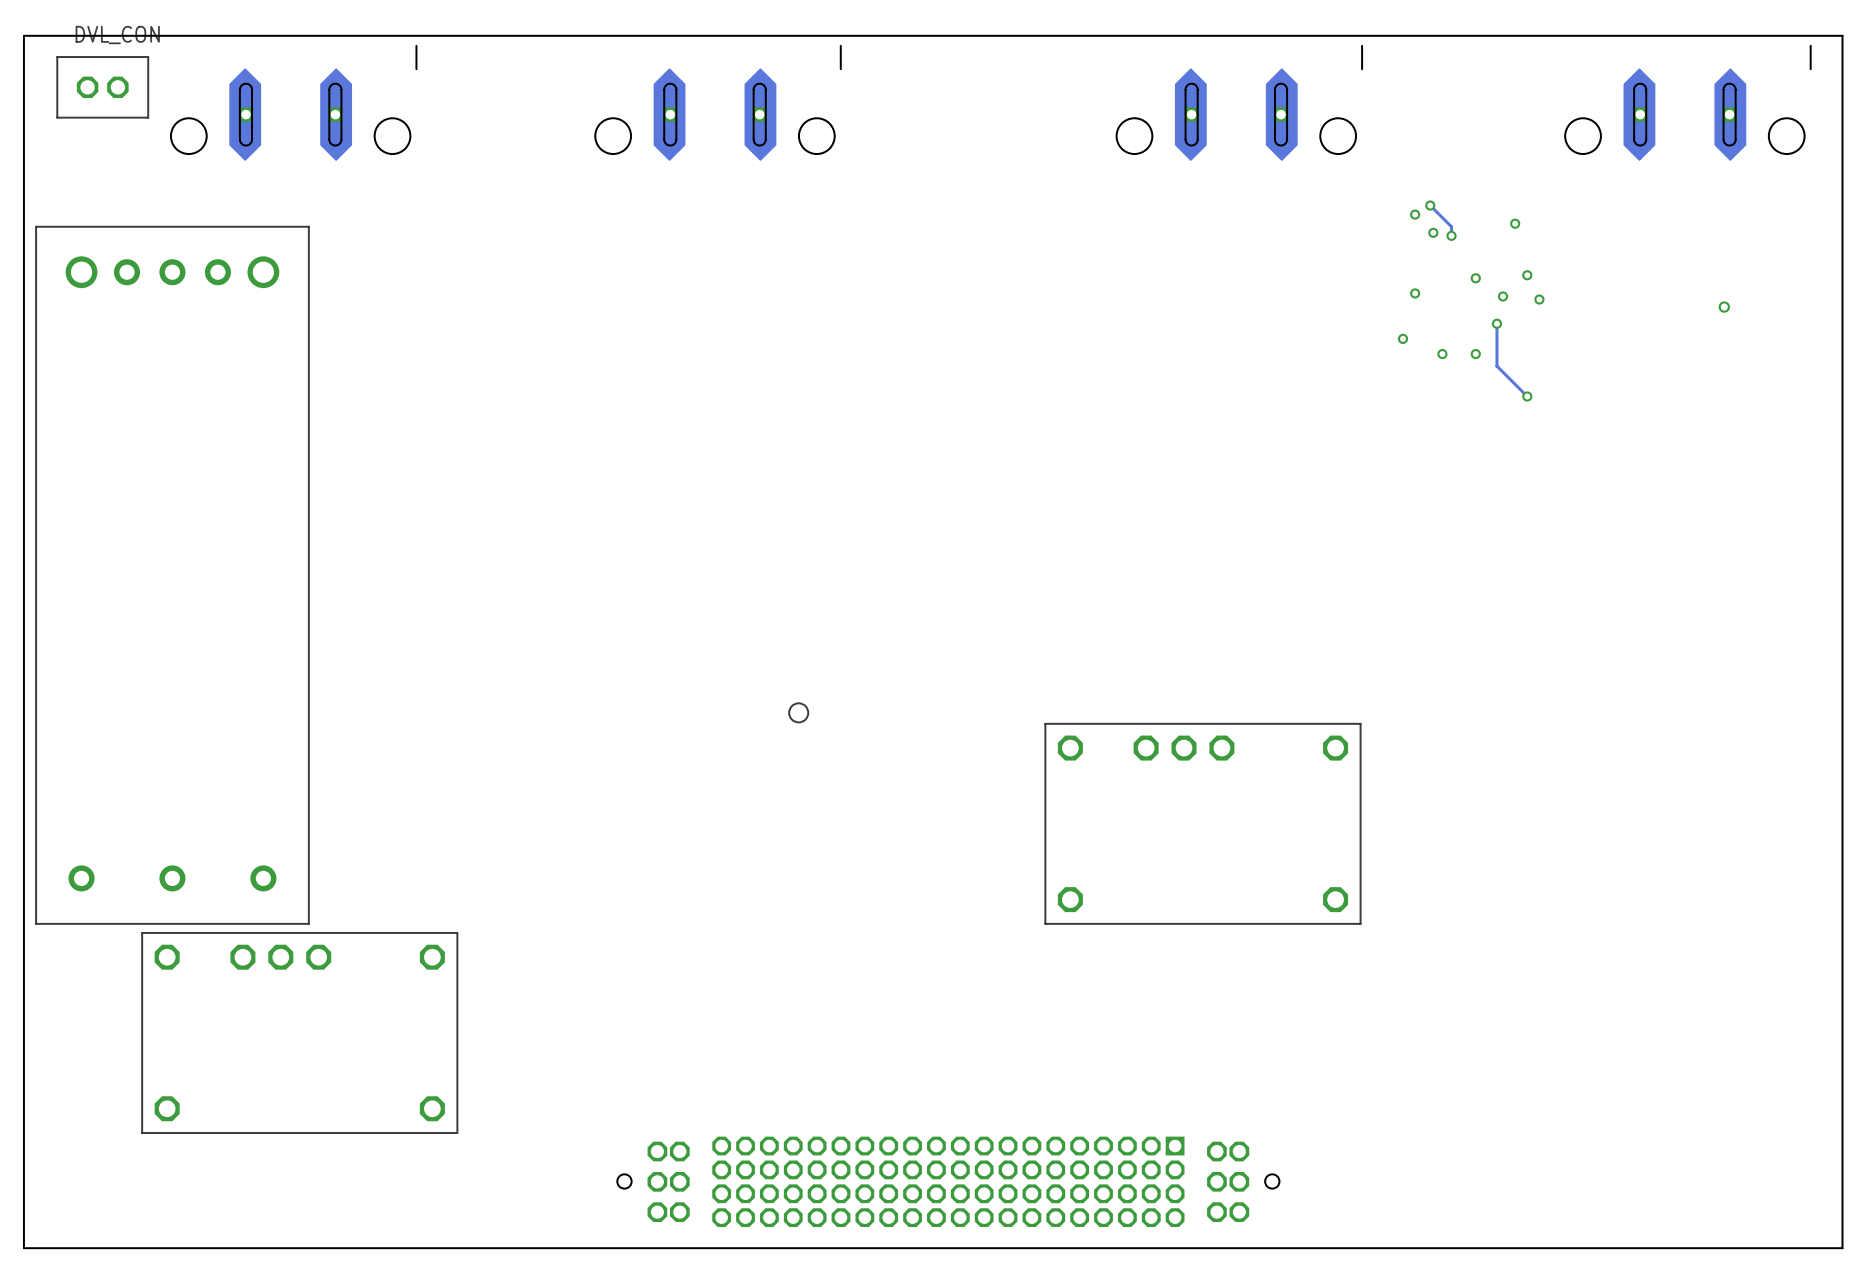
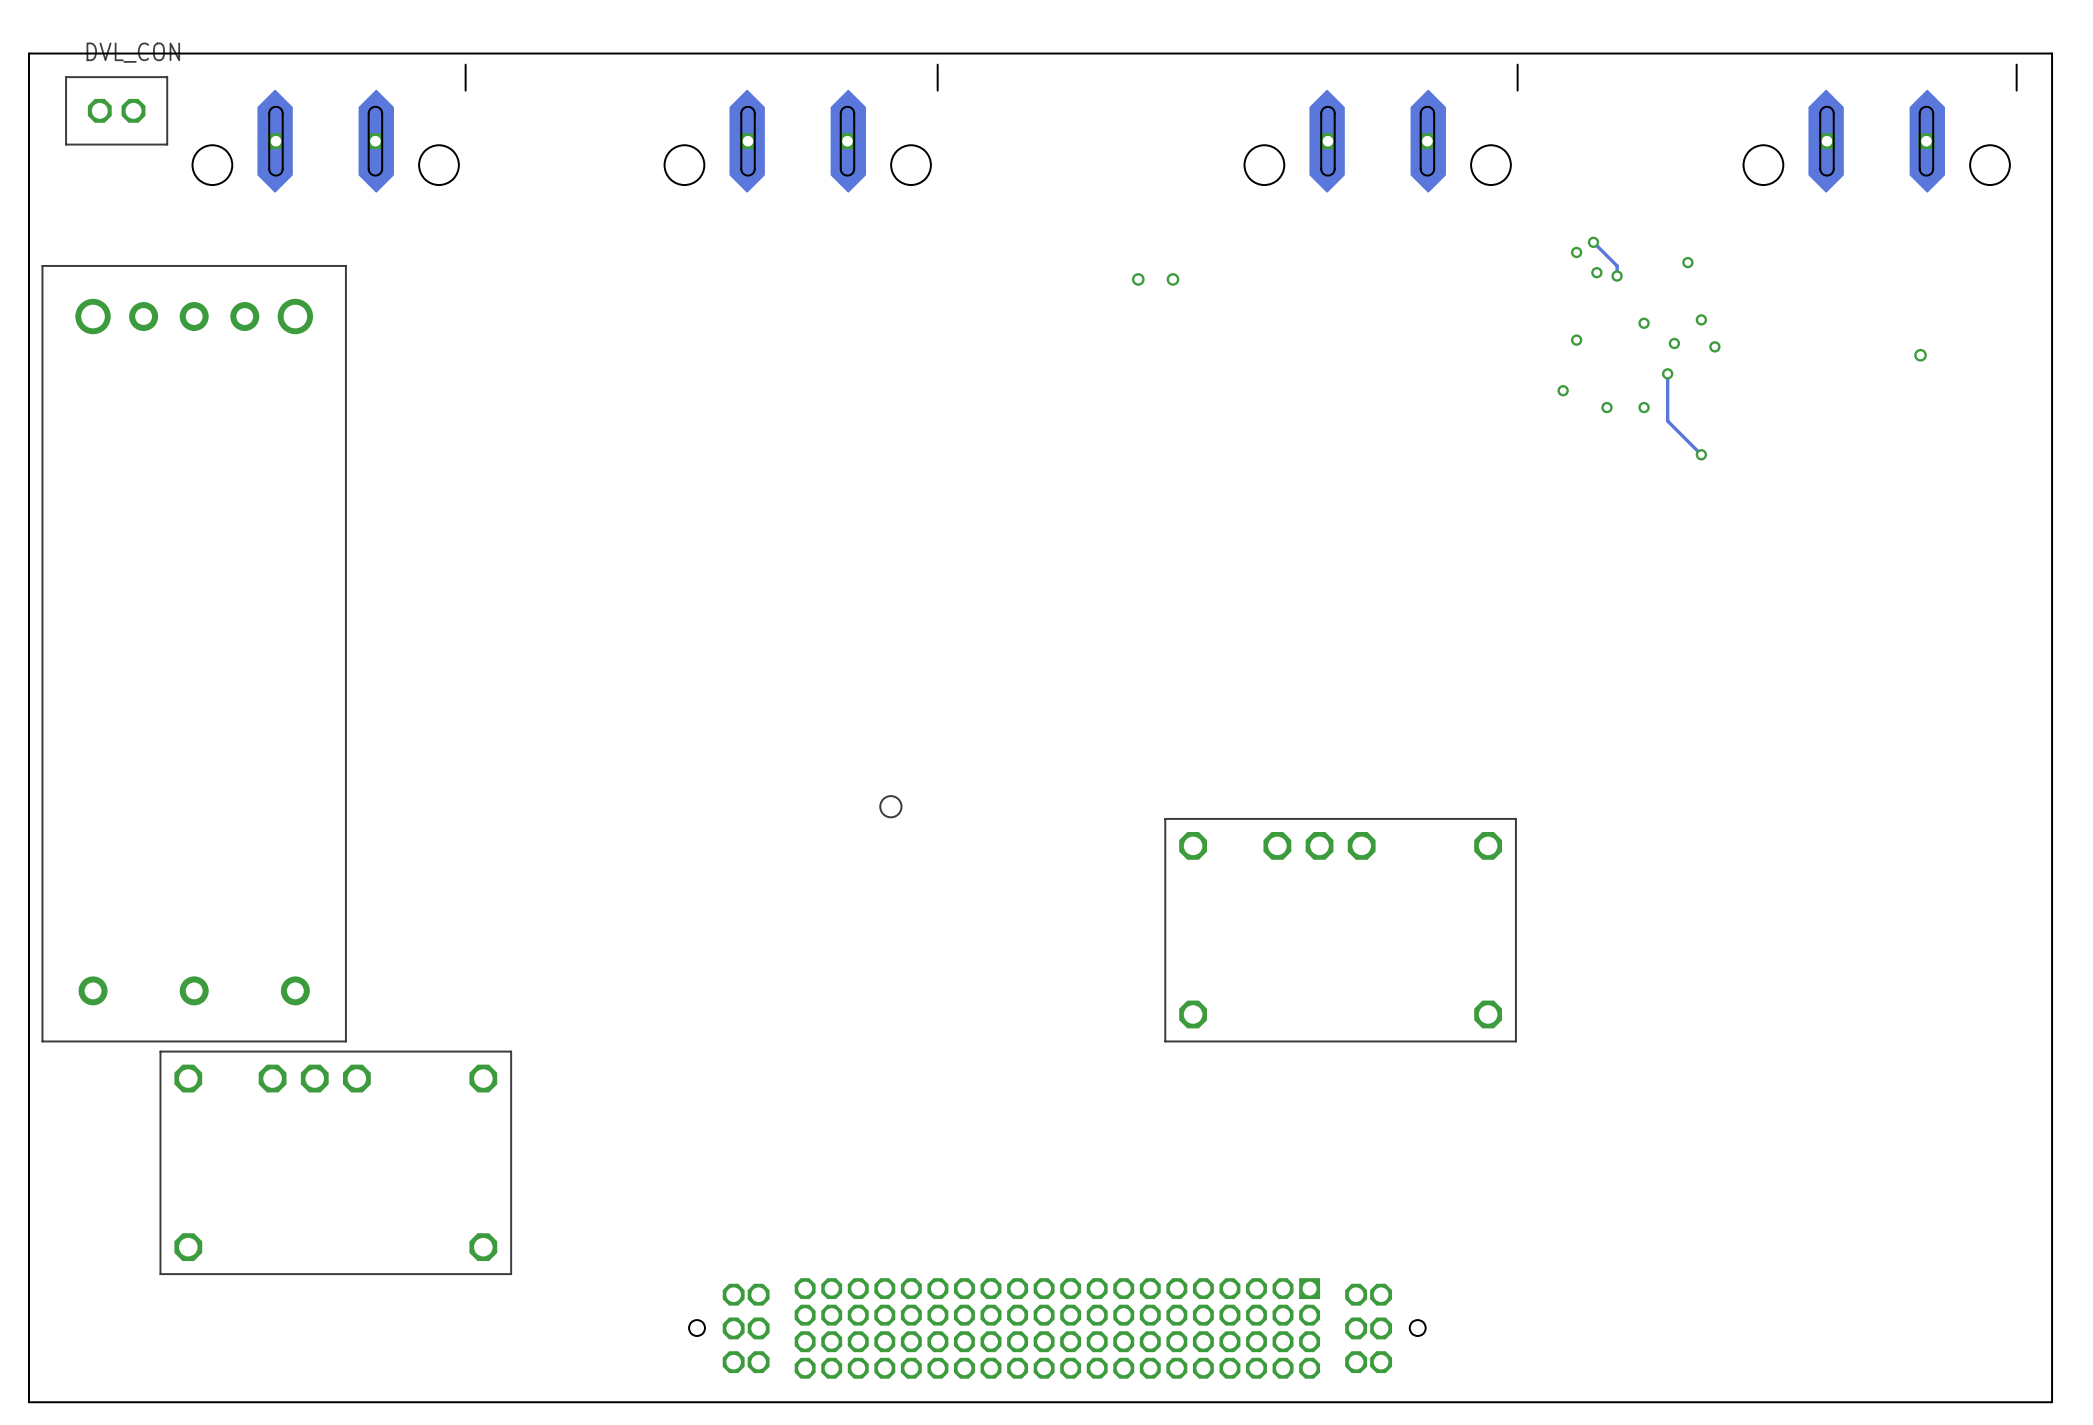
via: none -> (1138, 279)
via: none -> (1172, 279)

